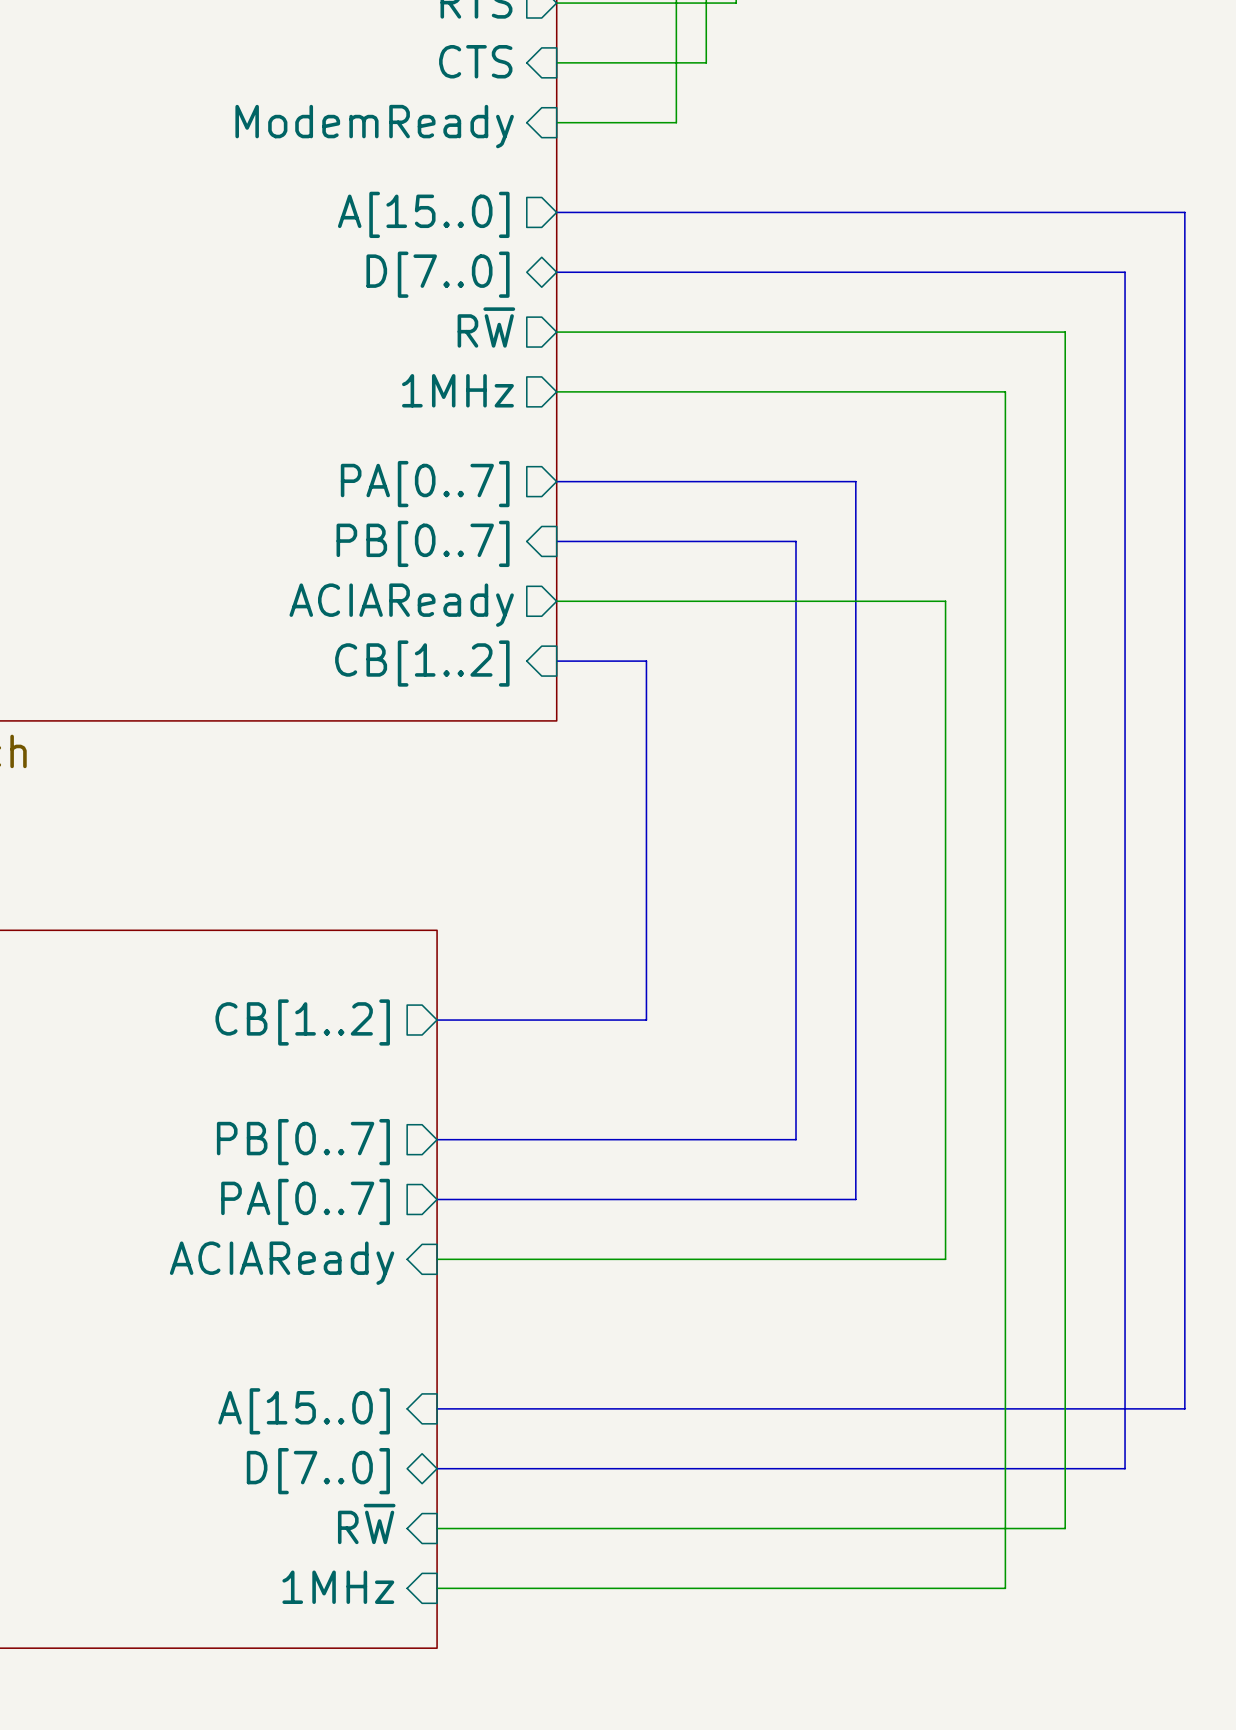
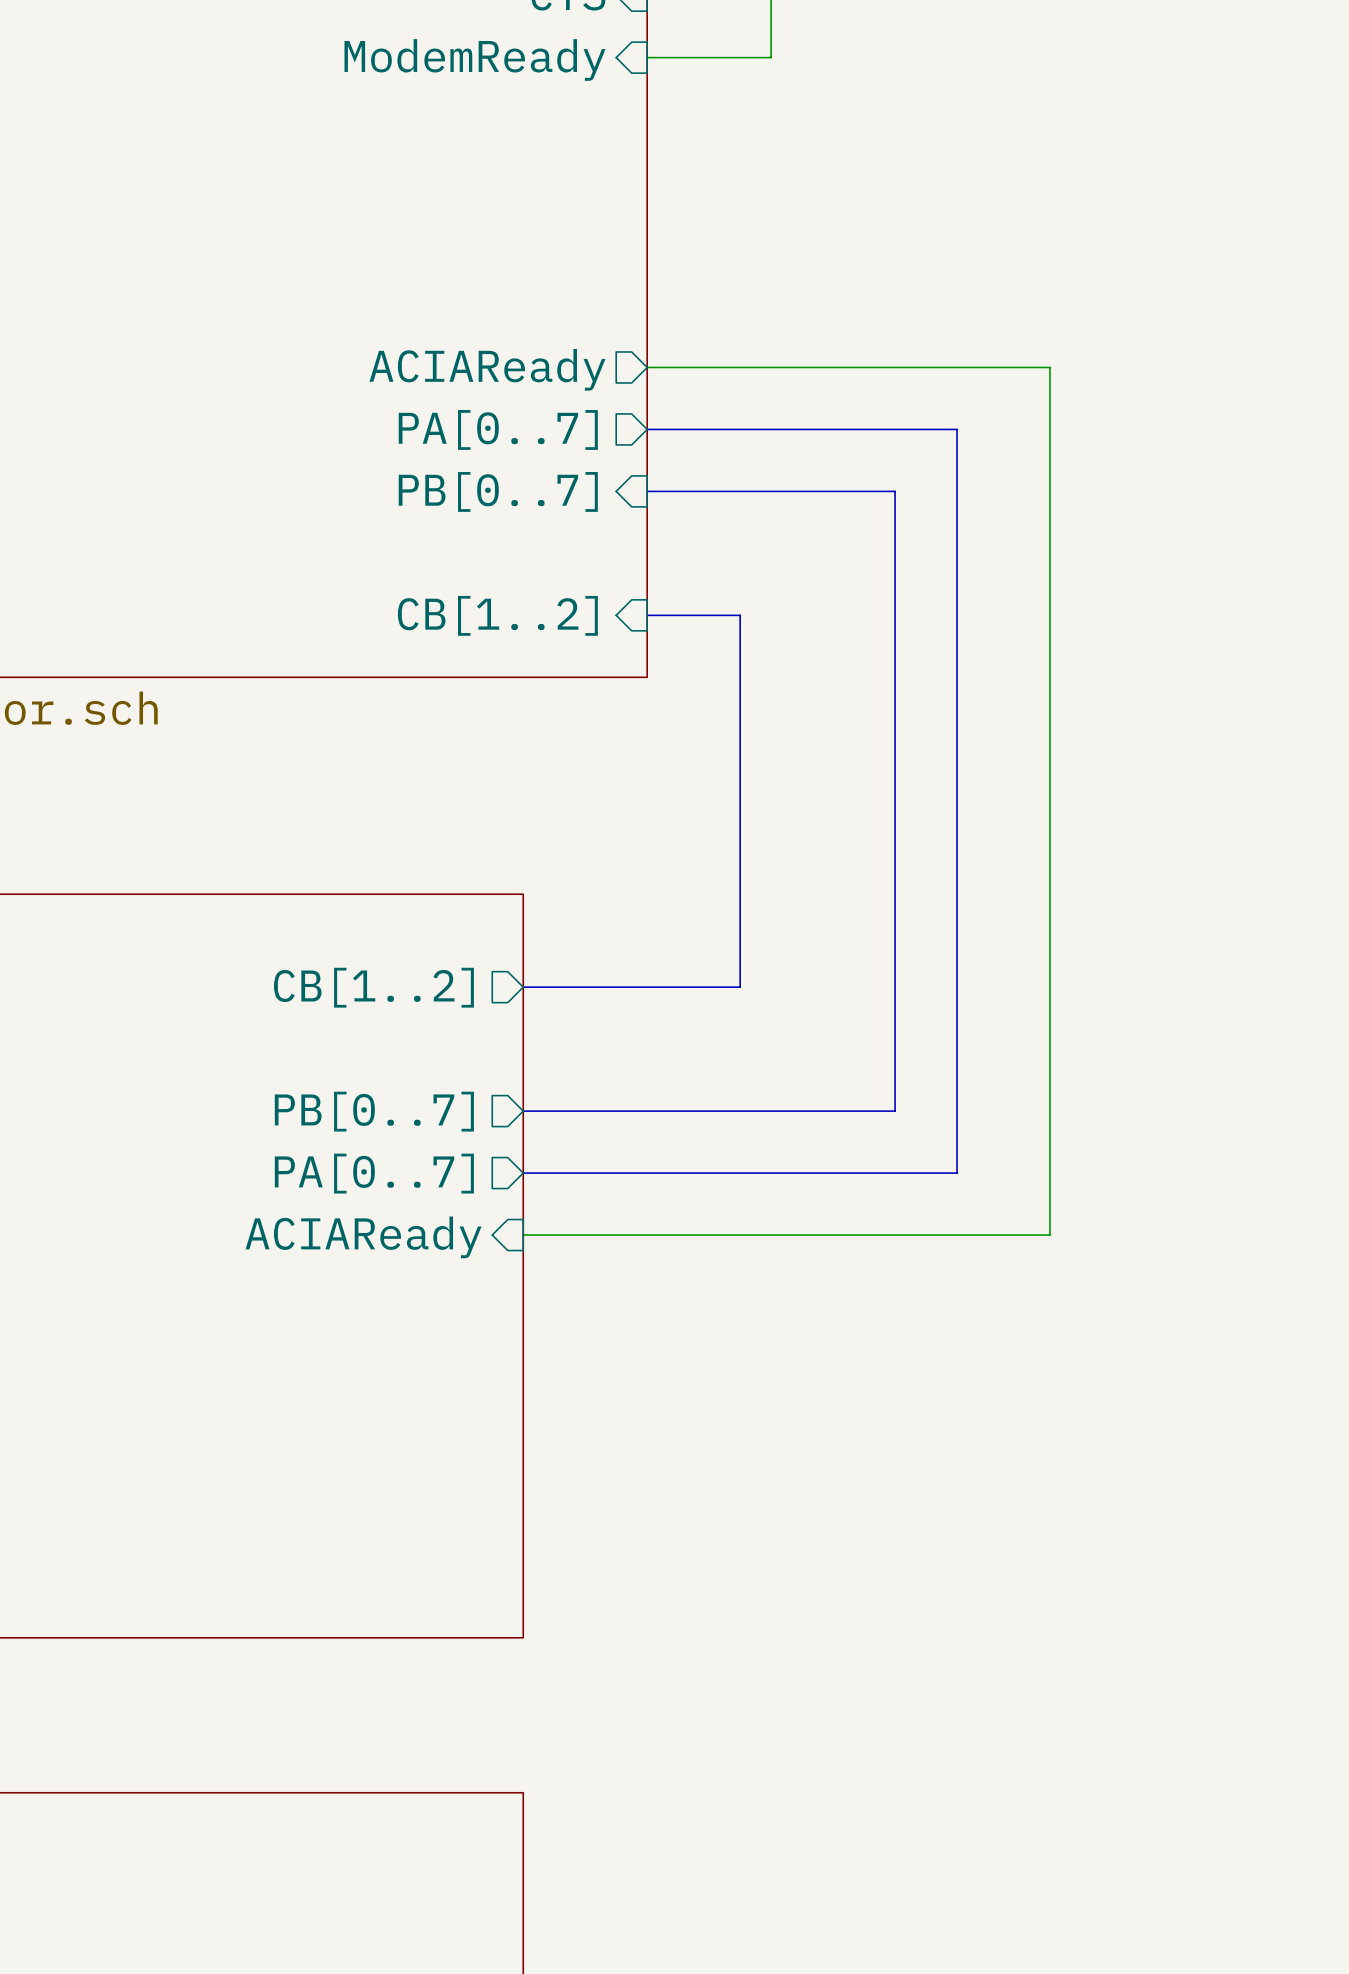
bus: (556, 212) (1184, 212) (1184, 1408) (437, 1408) -> none
sheet pin: A[15..0] (423, 214) -> none
bus: (556, 272) (1125, 272) (1125, 1468) (437, 1468) -> none
sheet pin: D[7..0] (438, 274) -> none
sheet pin: R~{W} (486, 327) -> none
wire: (556, 332) (1065, 332) (1065, 1528) (437, 1528) -> none
sheet pin: 1MHz (457, 390) -> none
wire: (556, 391) (1005, 391) (1005, 1588) (437, 1588) -> none
wire: (556, 601) (945, 601) -> (647, 367) (1049, 367) (1049, 553)
sheet pin position: ACIAReady (401, 605) -> ACIAReady (487, 369)
sheet pin: A[15..0] (304, 1411) -> none
sheet pin: D[7..0] (318, 1471) -> none
sheet pin: R~{W} (366, 1523) -> none
sheet pin: 1MHz (338, 1587) -> none

